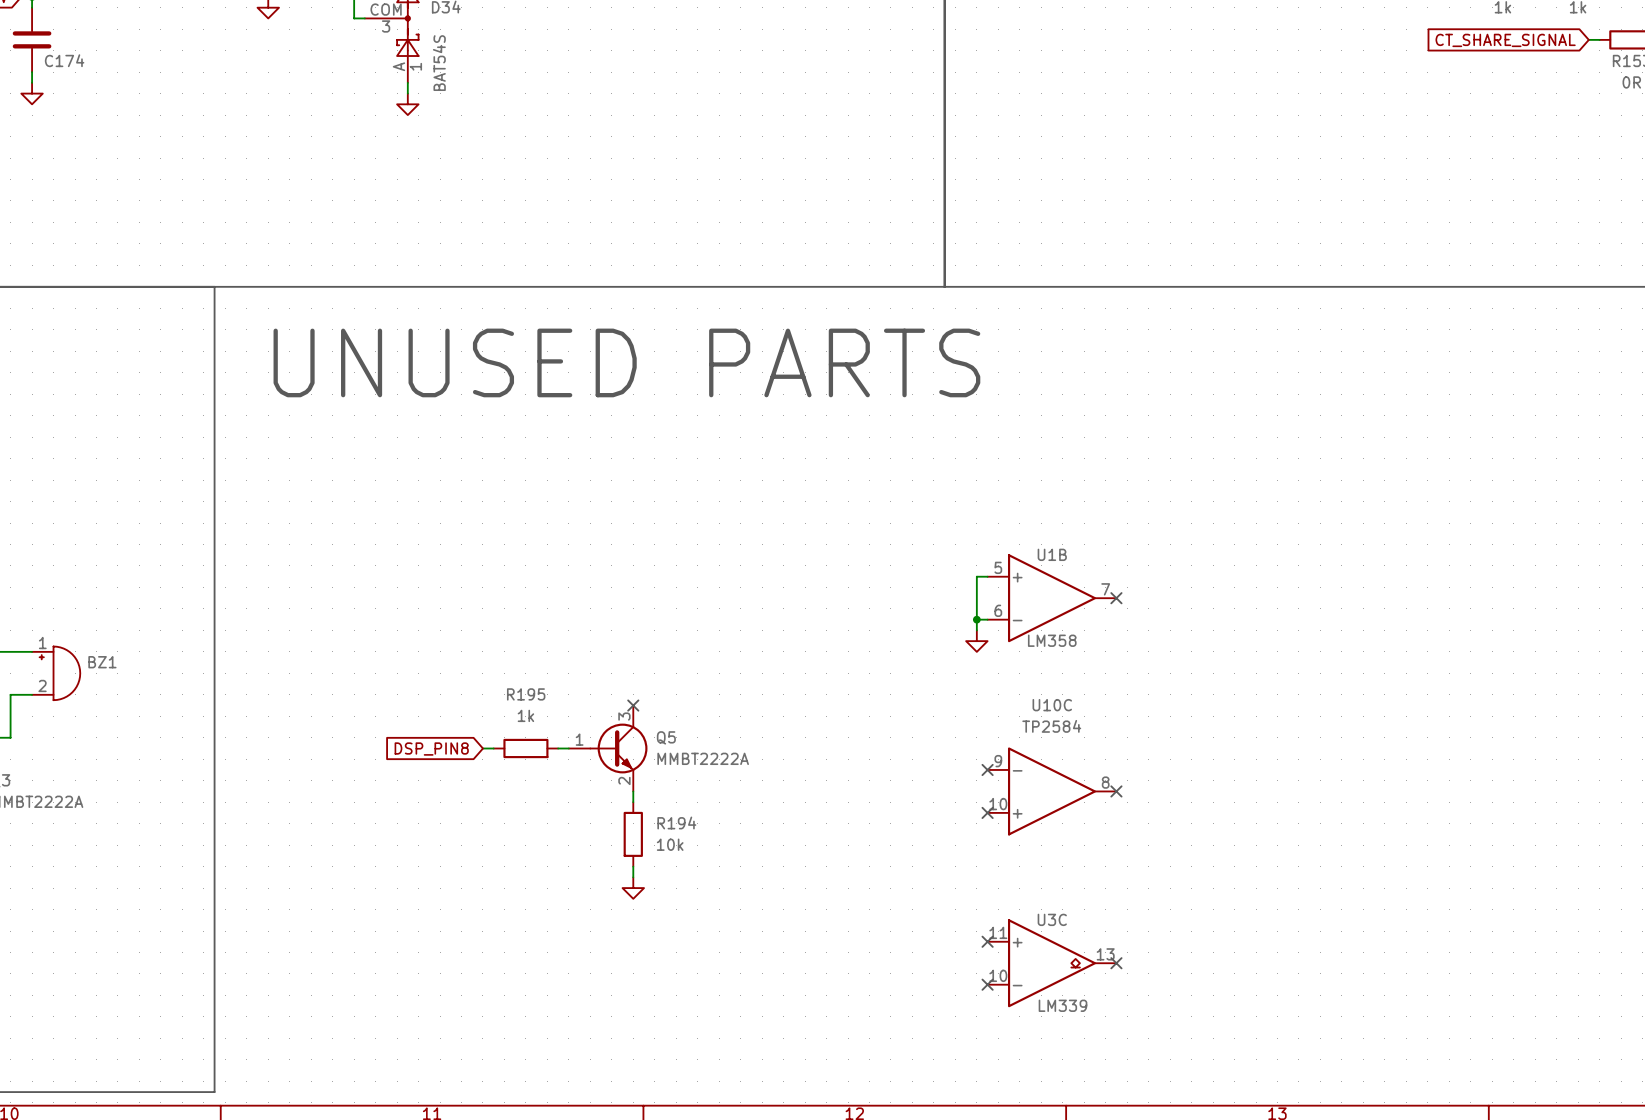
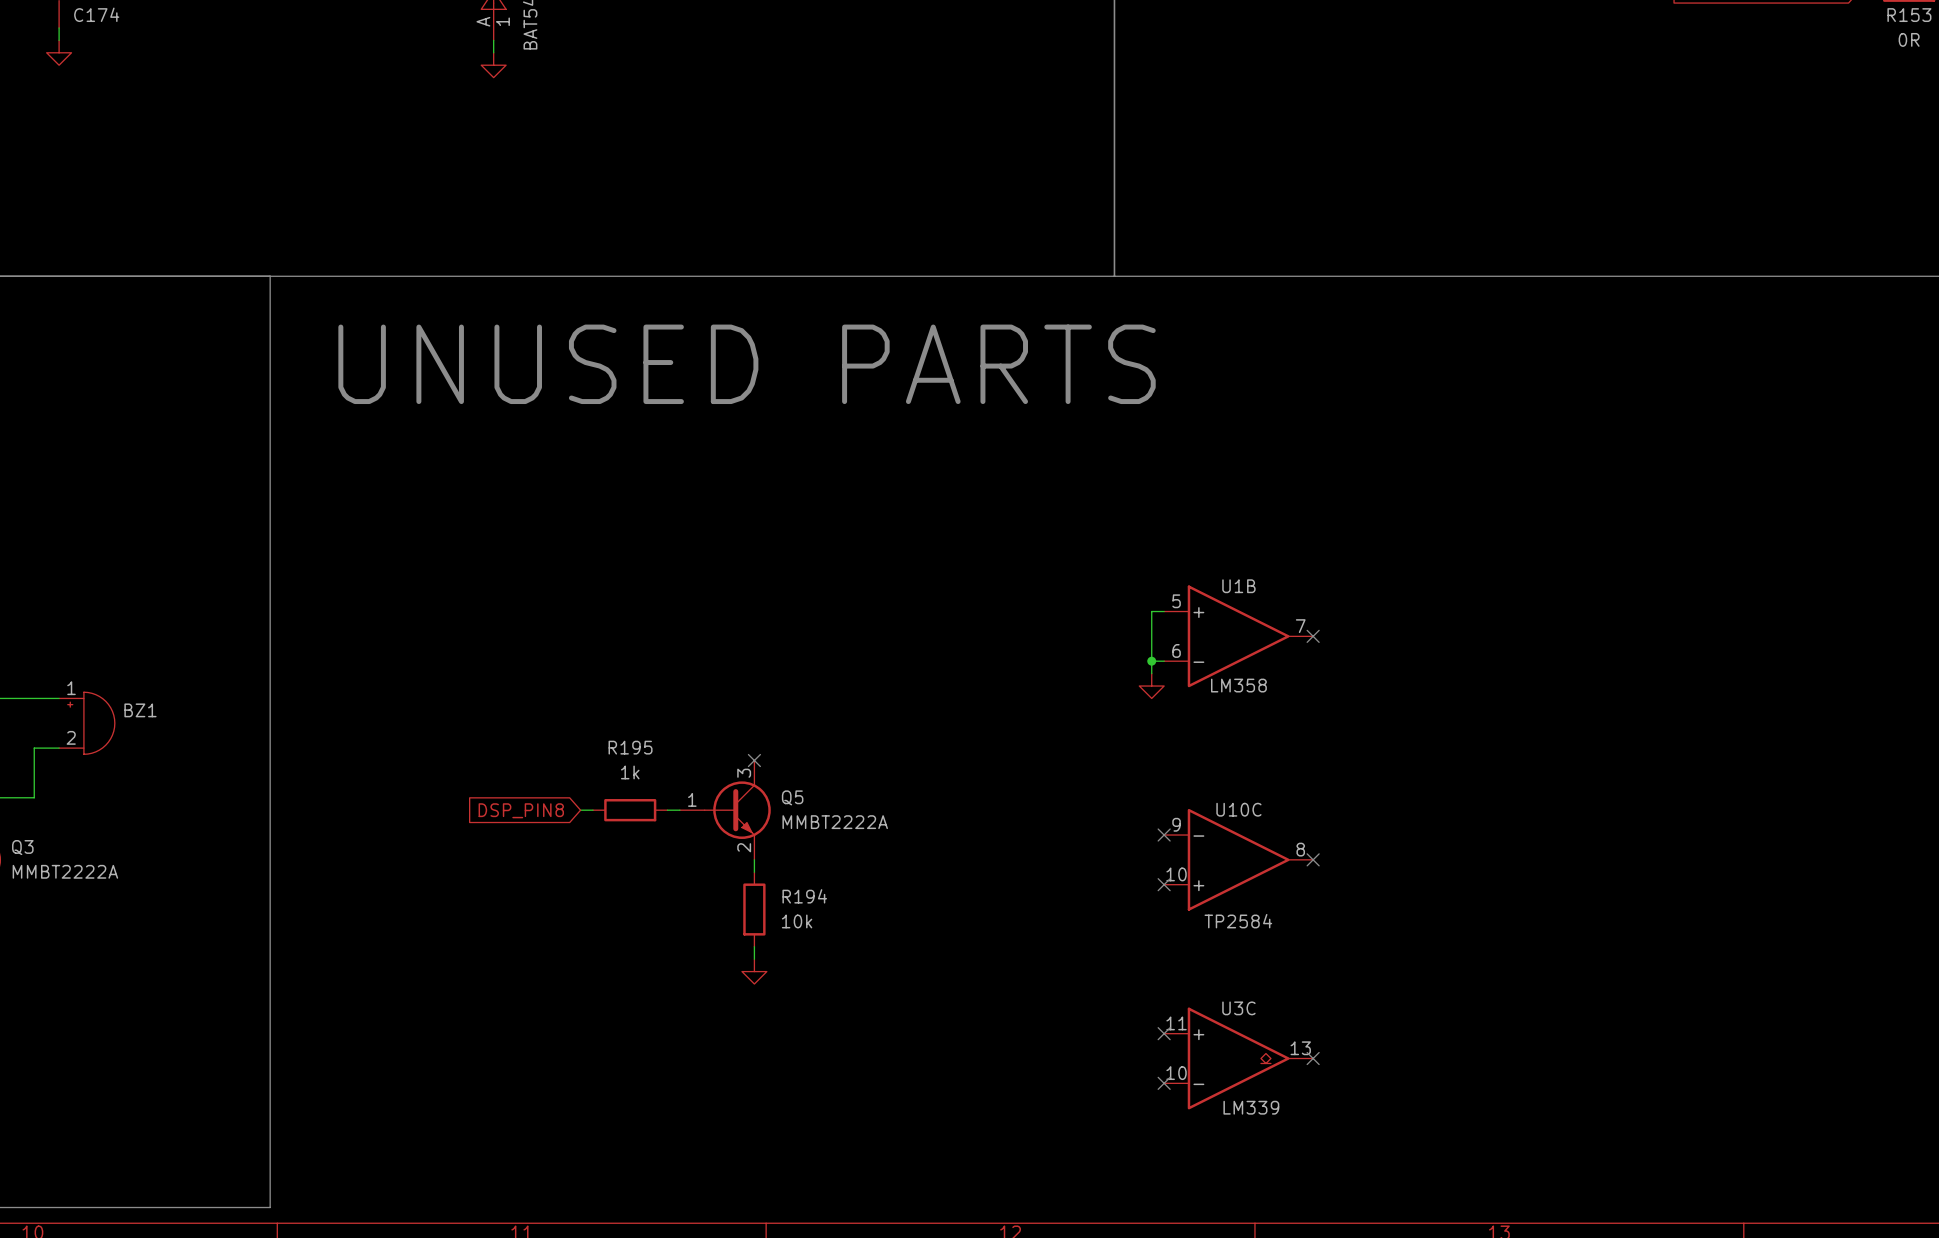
U10C name position: U10C (1052, 705) -> U10C (1238, 809)
U10C value position: TP2584 (1051, 726) -> TP2584 (1238, 921)

